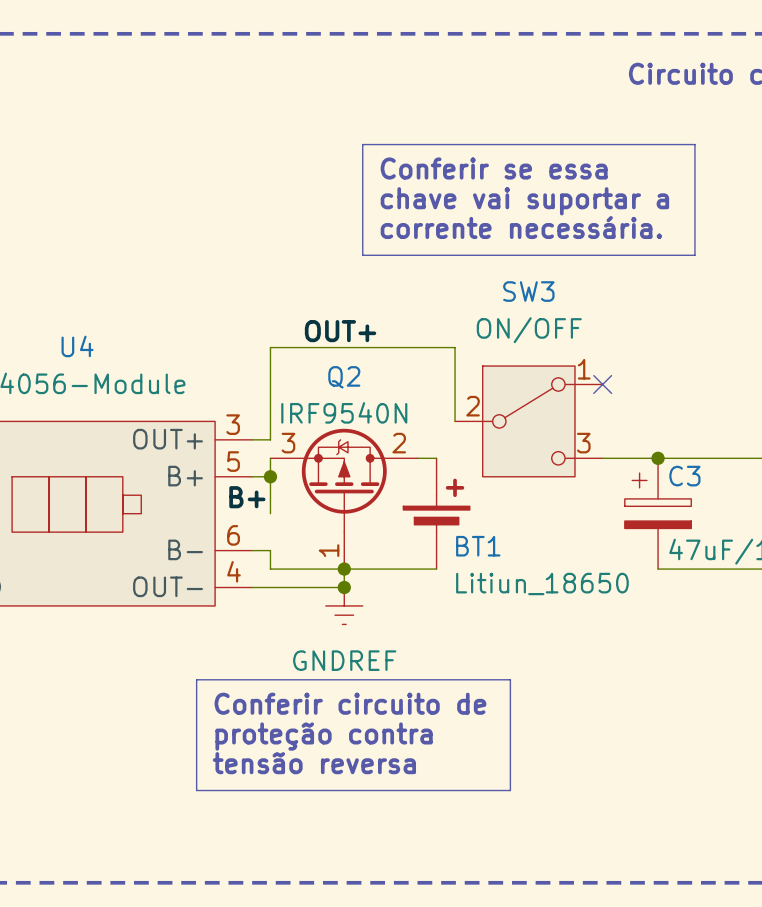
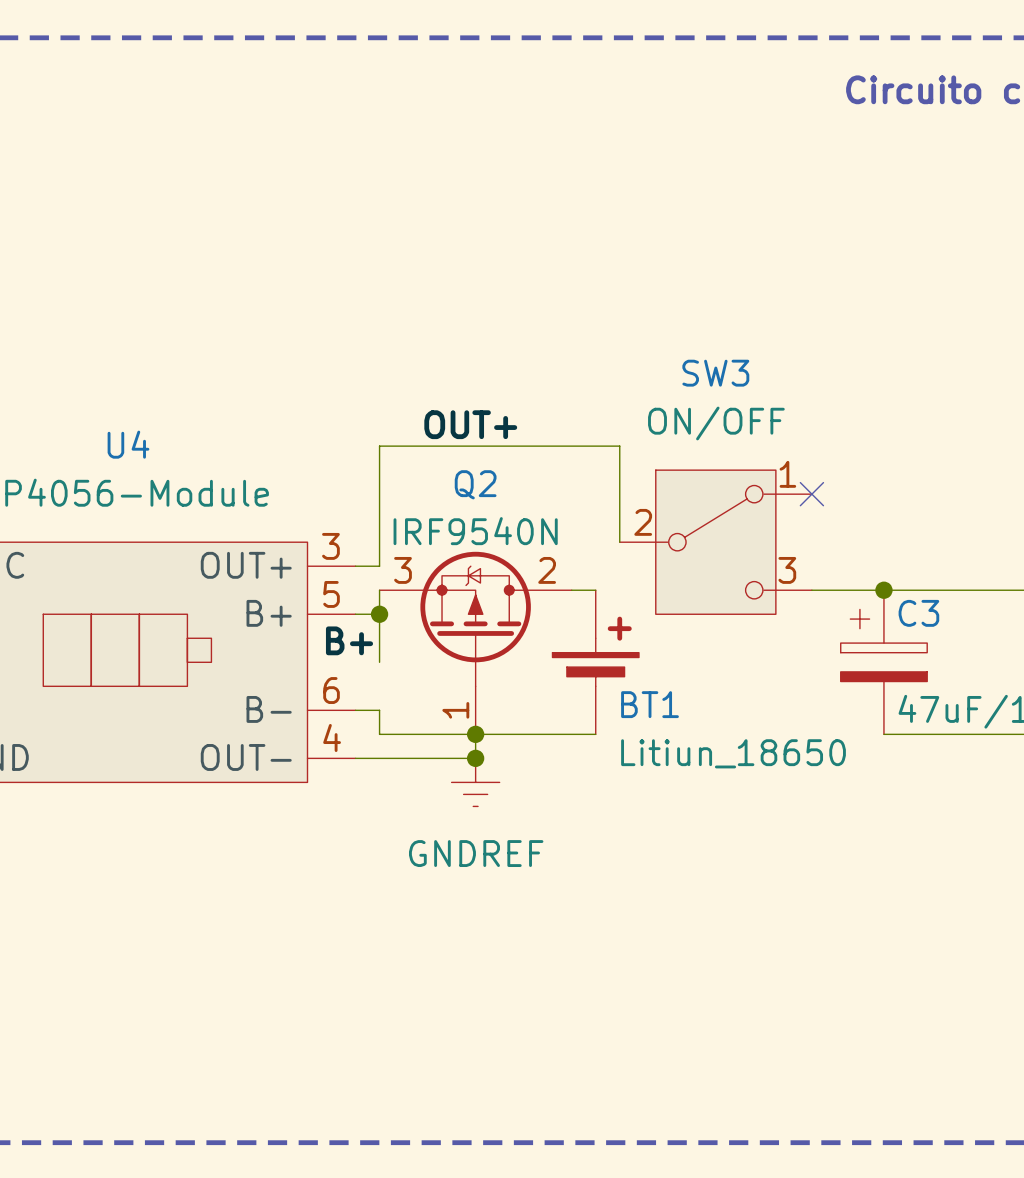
line: (362, 144) (694, 144) (694, 255) (362, 255) (362, 144) -> none
text: Conferir se essa (494, 168) -> none
text: chave vai suportar a (524, 201) -> none
text: corrente necessária. (521, 227) -> none
line: (196, 679) (510, 679) (510, 790) (196, 790) (196, 679) -> none
text: Conferir circuito de (350, 703) -> none
text: proteção contra (324, 736) -> none
text: tensão reversa (314, 763) -> none

